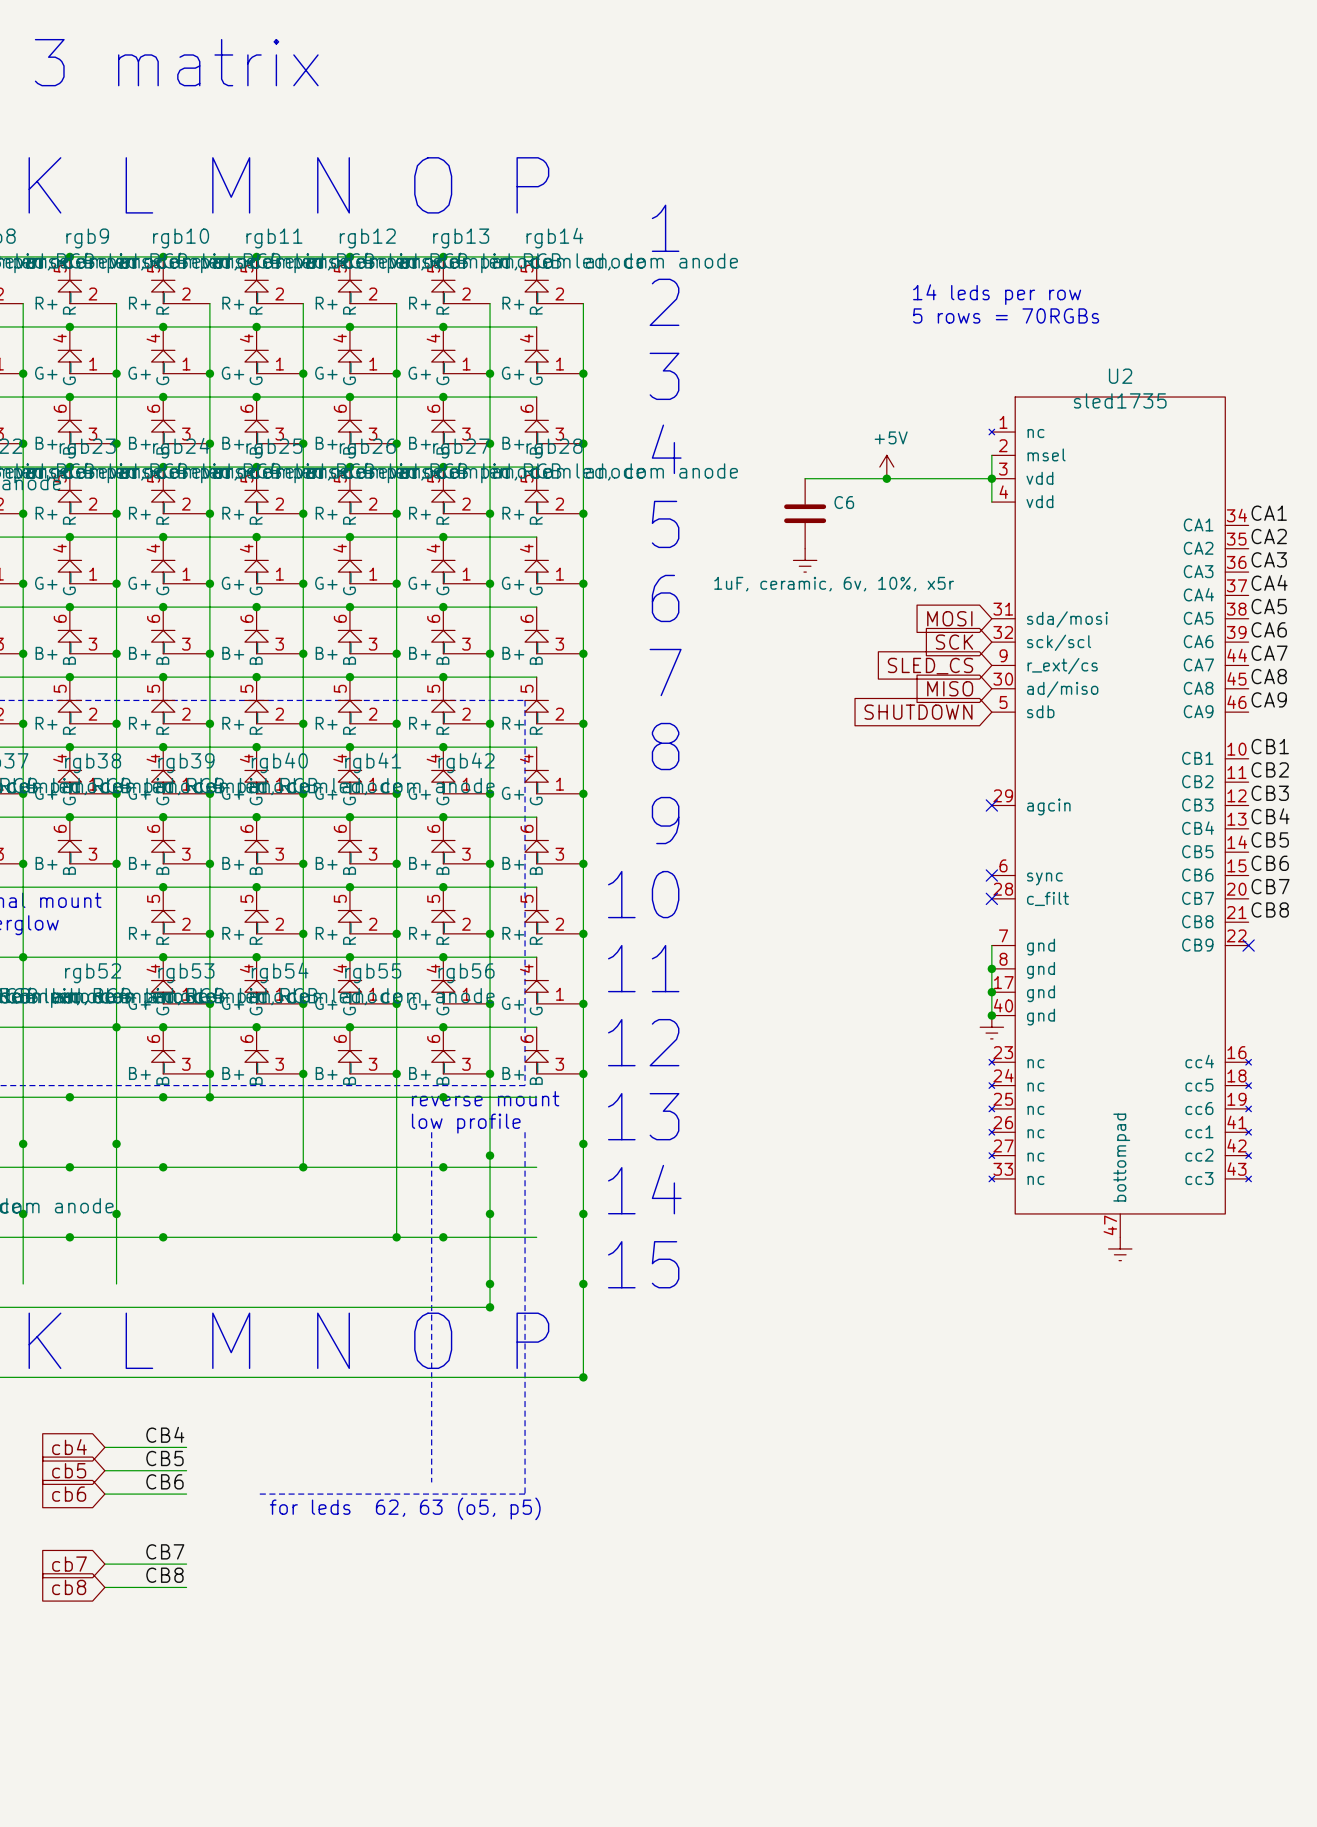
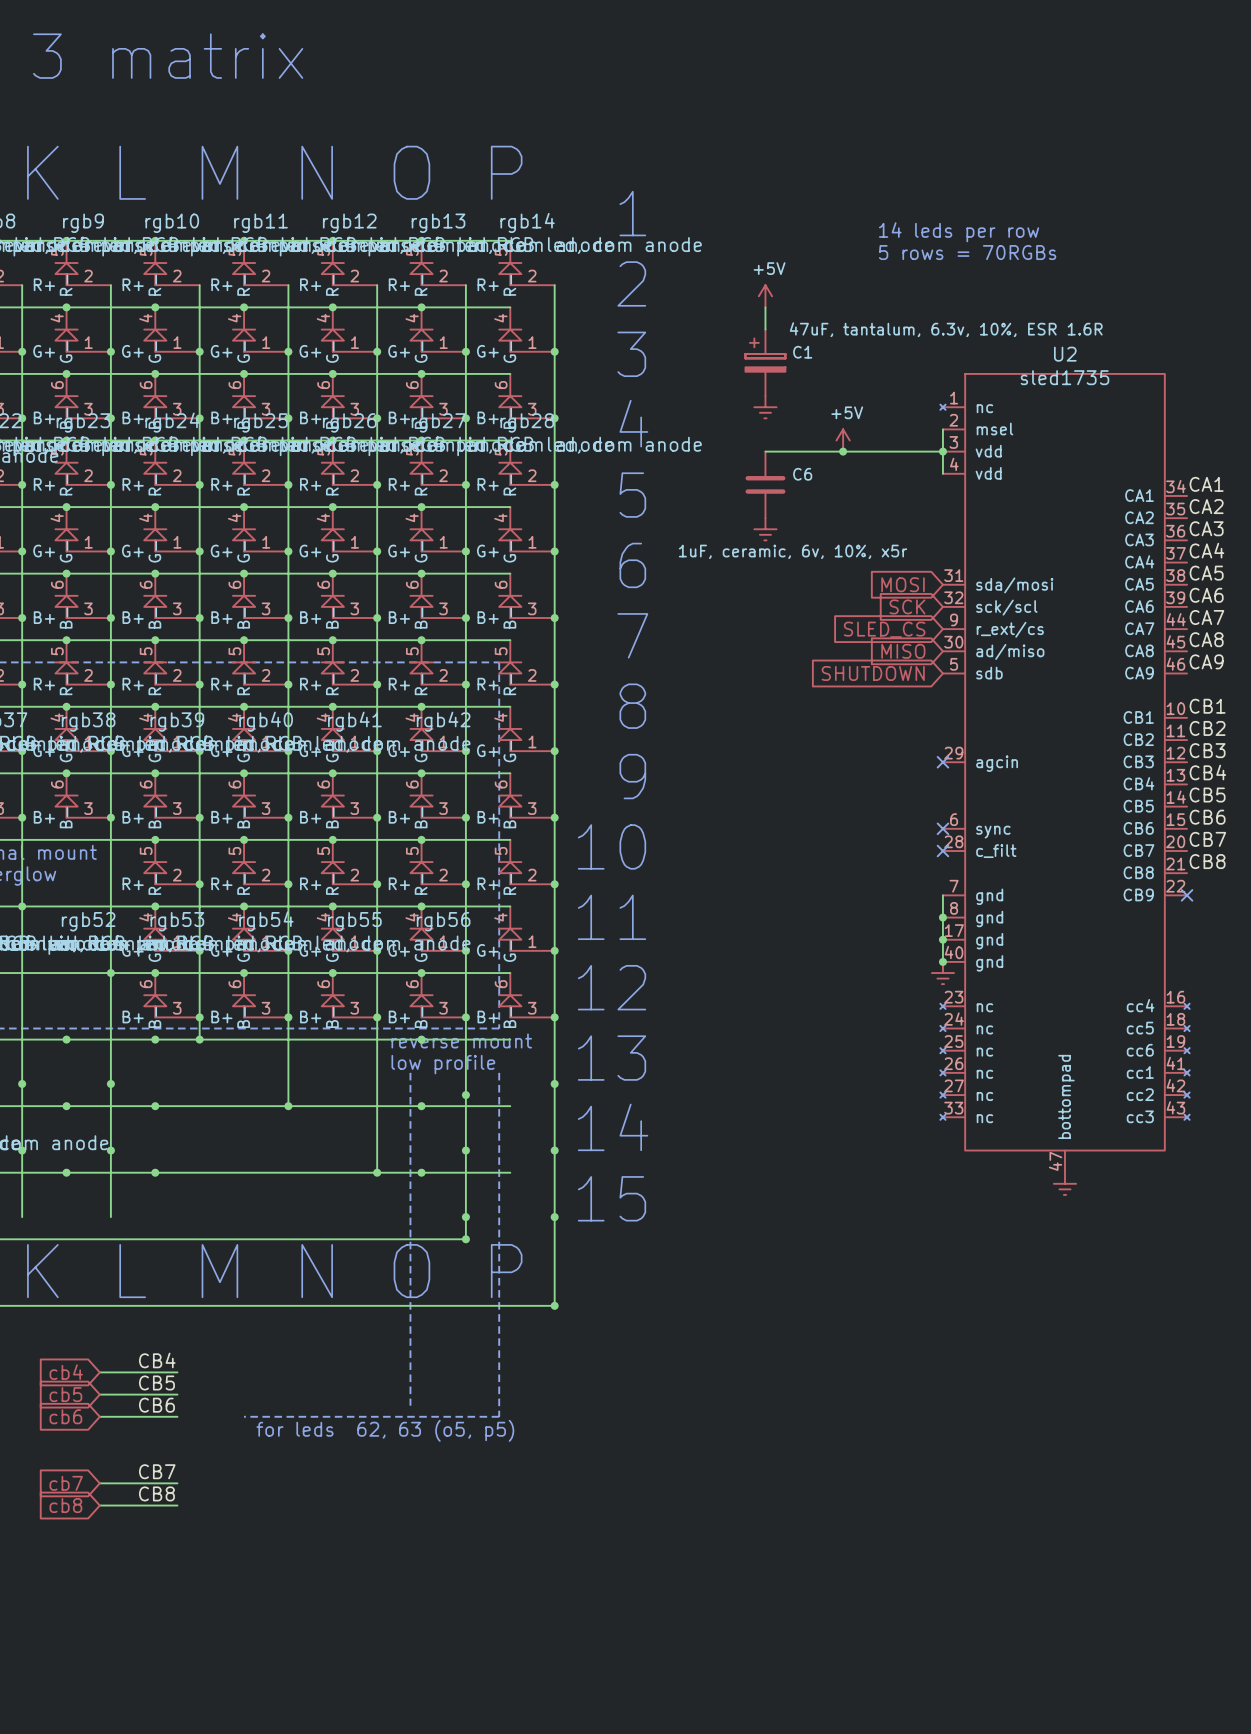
text position: 14 leds per row (997, 294) -> 14 leds per row (959, 232)
power symbol: none -> +5V (765, 296)
text position: 5 rows = 70RGBs (1006, 315) -> 5 rows = 70RGBs (967, 252)
wire: none -> (765, 307) (765, 329)
C1: none -> 47uF, tantalum, 6.3v, 10%, ESR 1.6R (765, 362)
power symbol: none -> (765, 407)

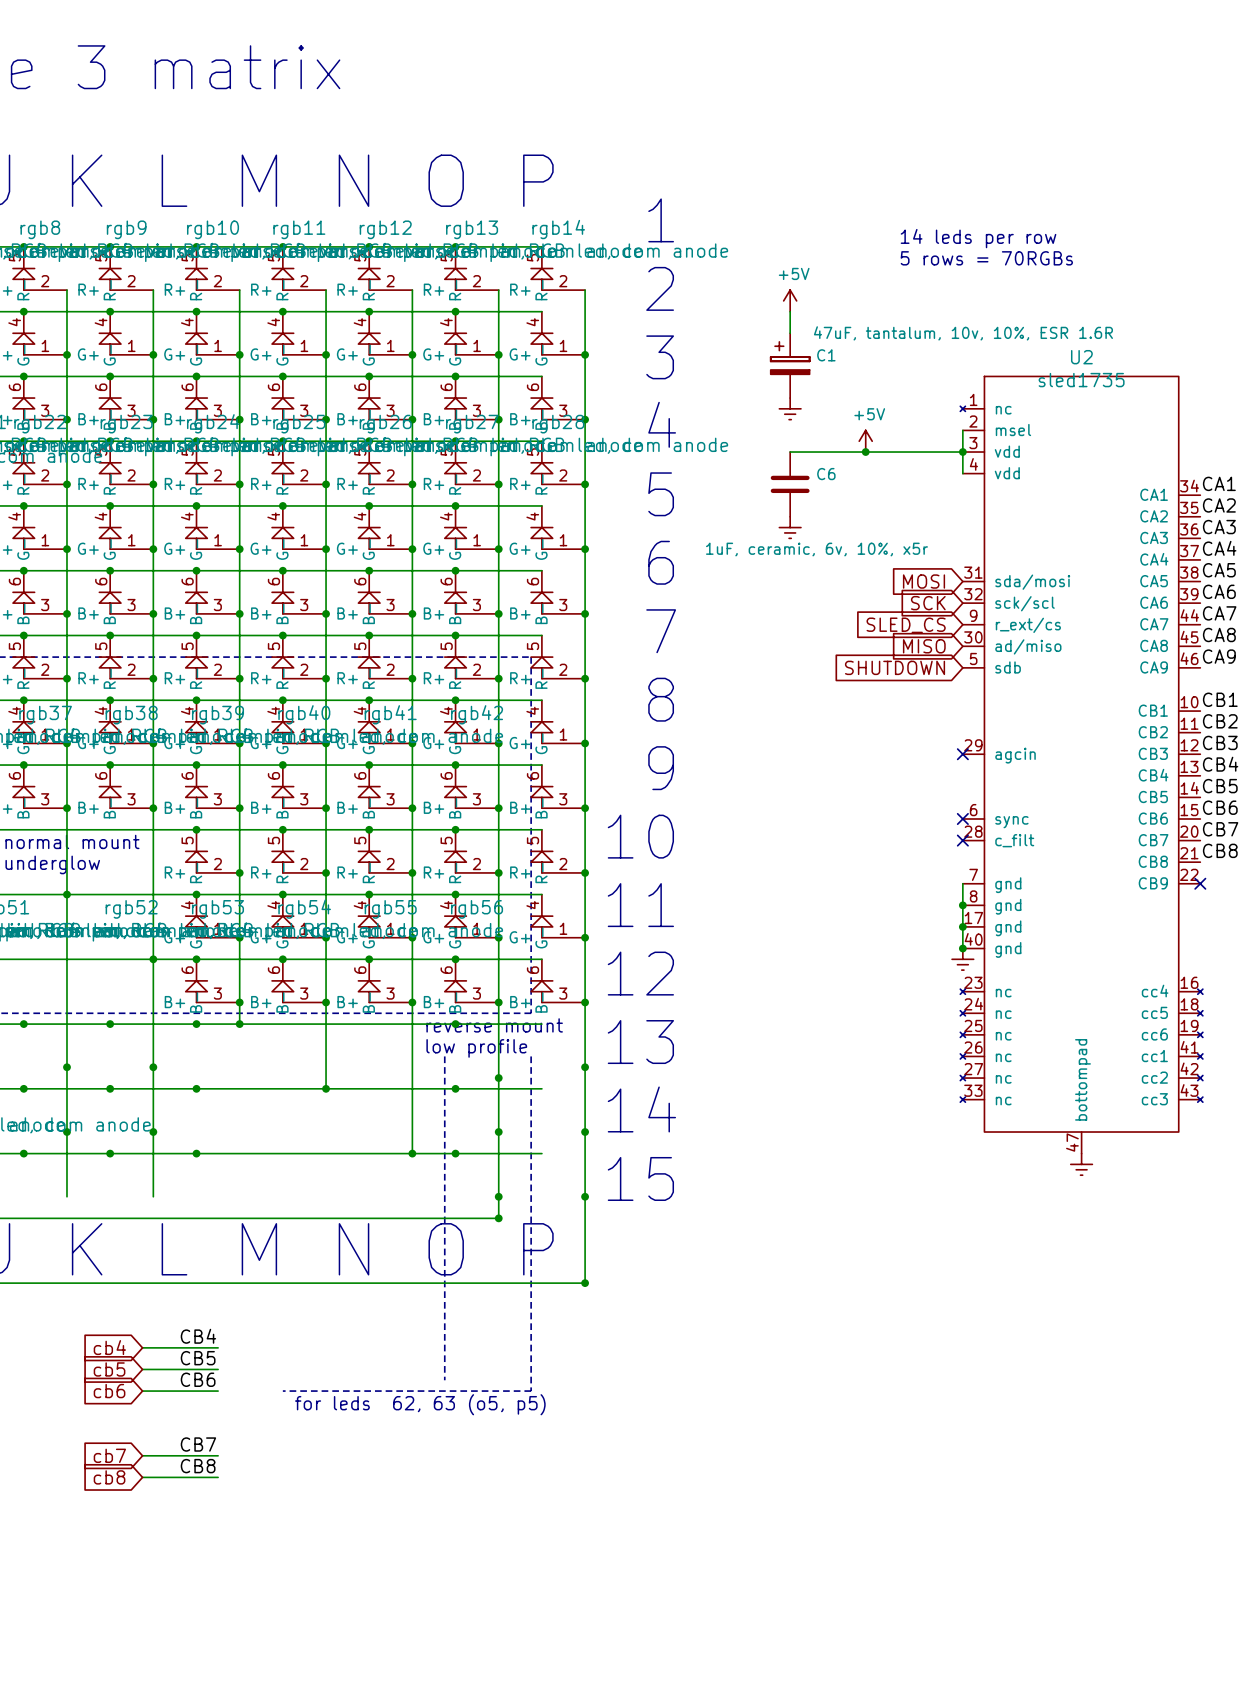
C1 value: 47uF, tantalum, 6.3v, 10%, ESR 1.6R (946, 329) -> 47uF, tantalum, 10v, 10%, ESR 1.6R (963, 333)

